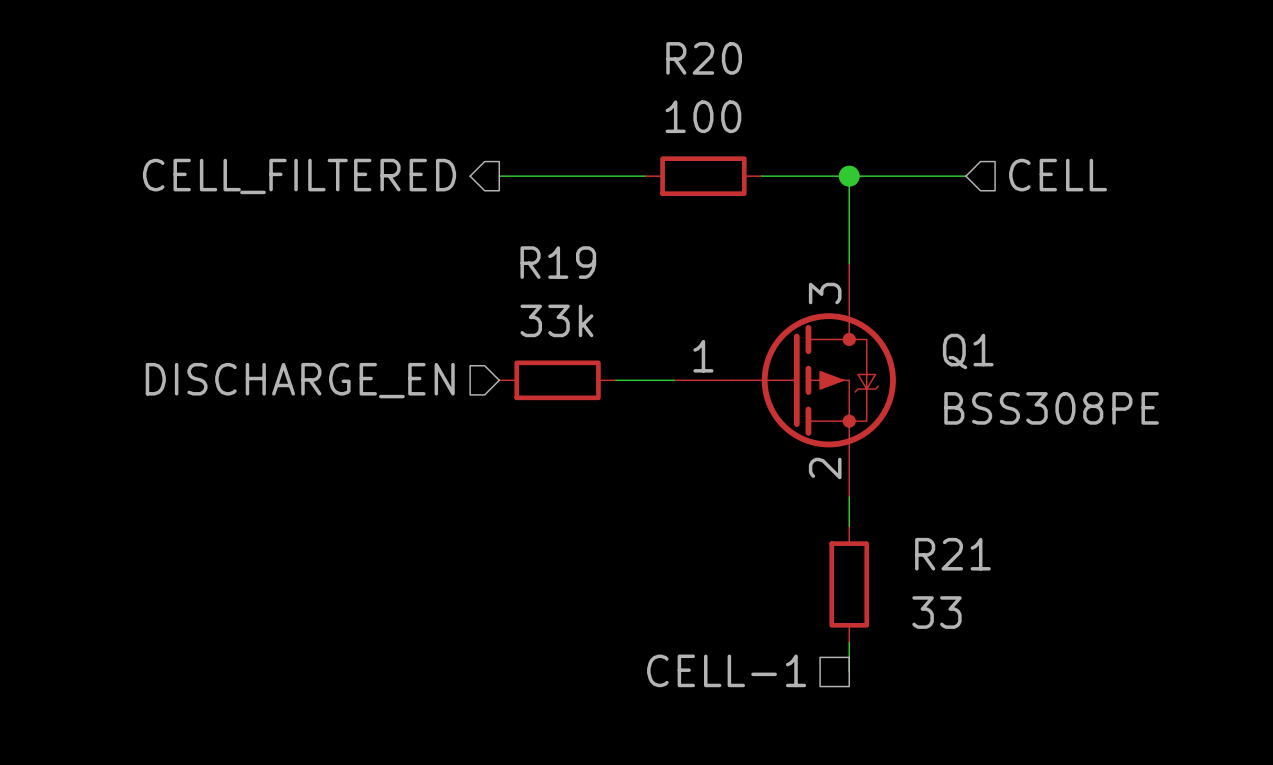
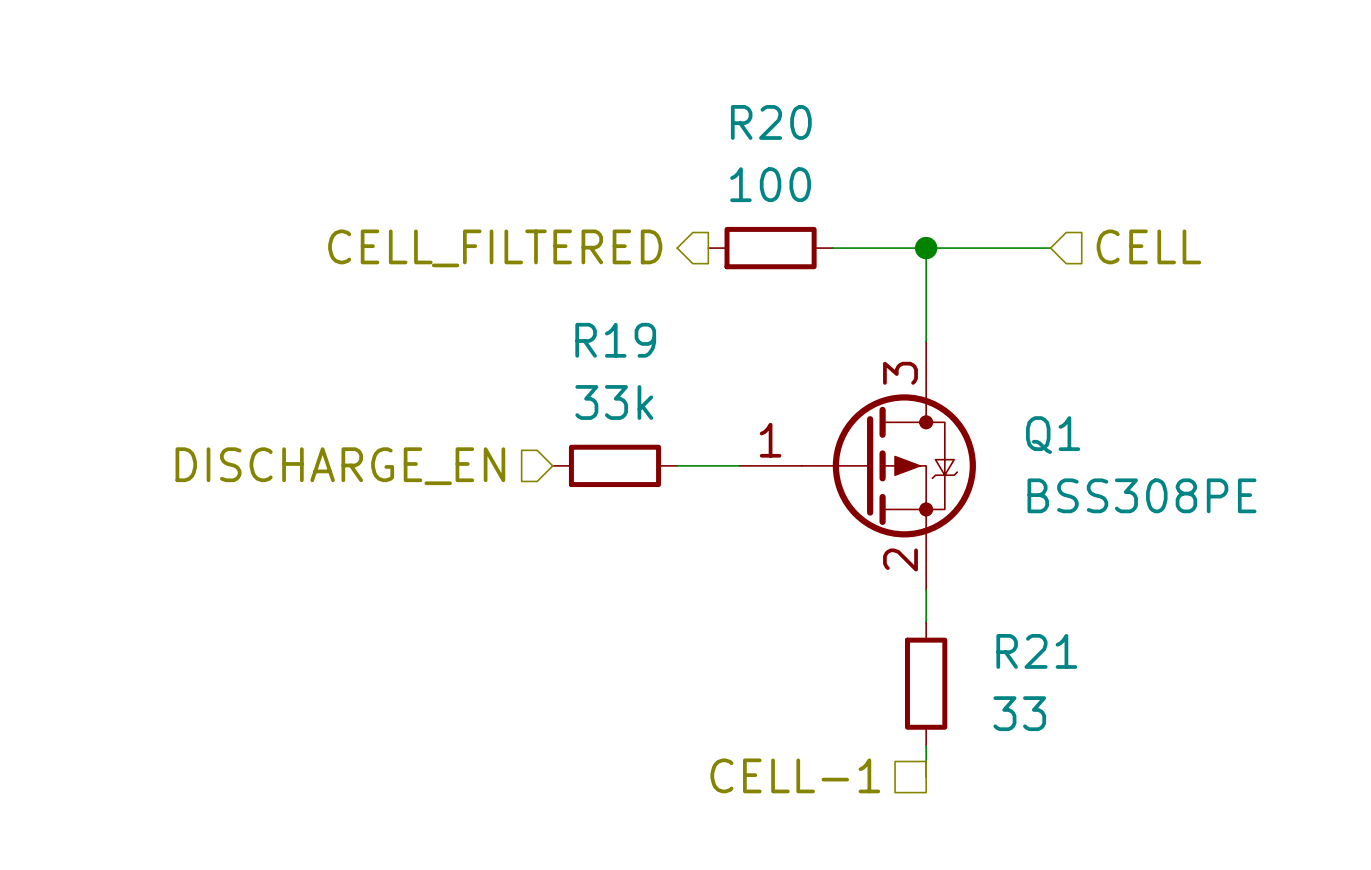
hierarchical label position: CELL_FILTERED (299, 176) -> CELL_FILTERED (495, 248)
wire: (499, 176) (645, 176) -> none

